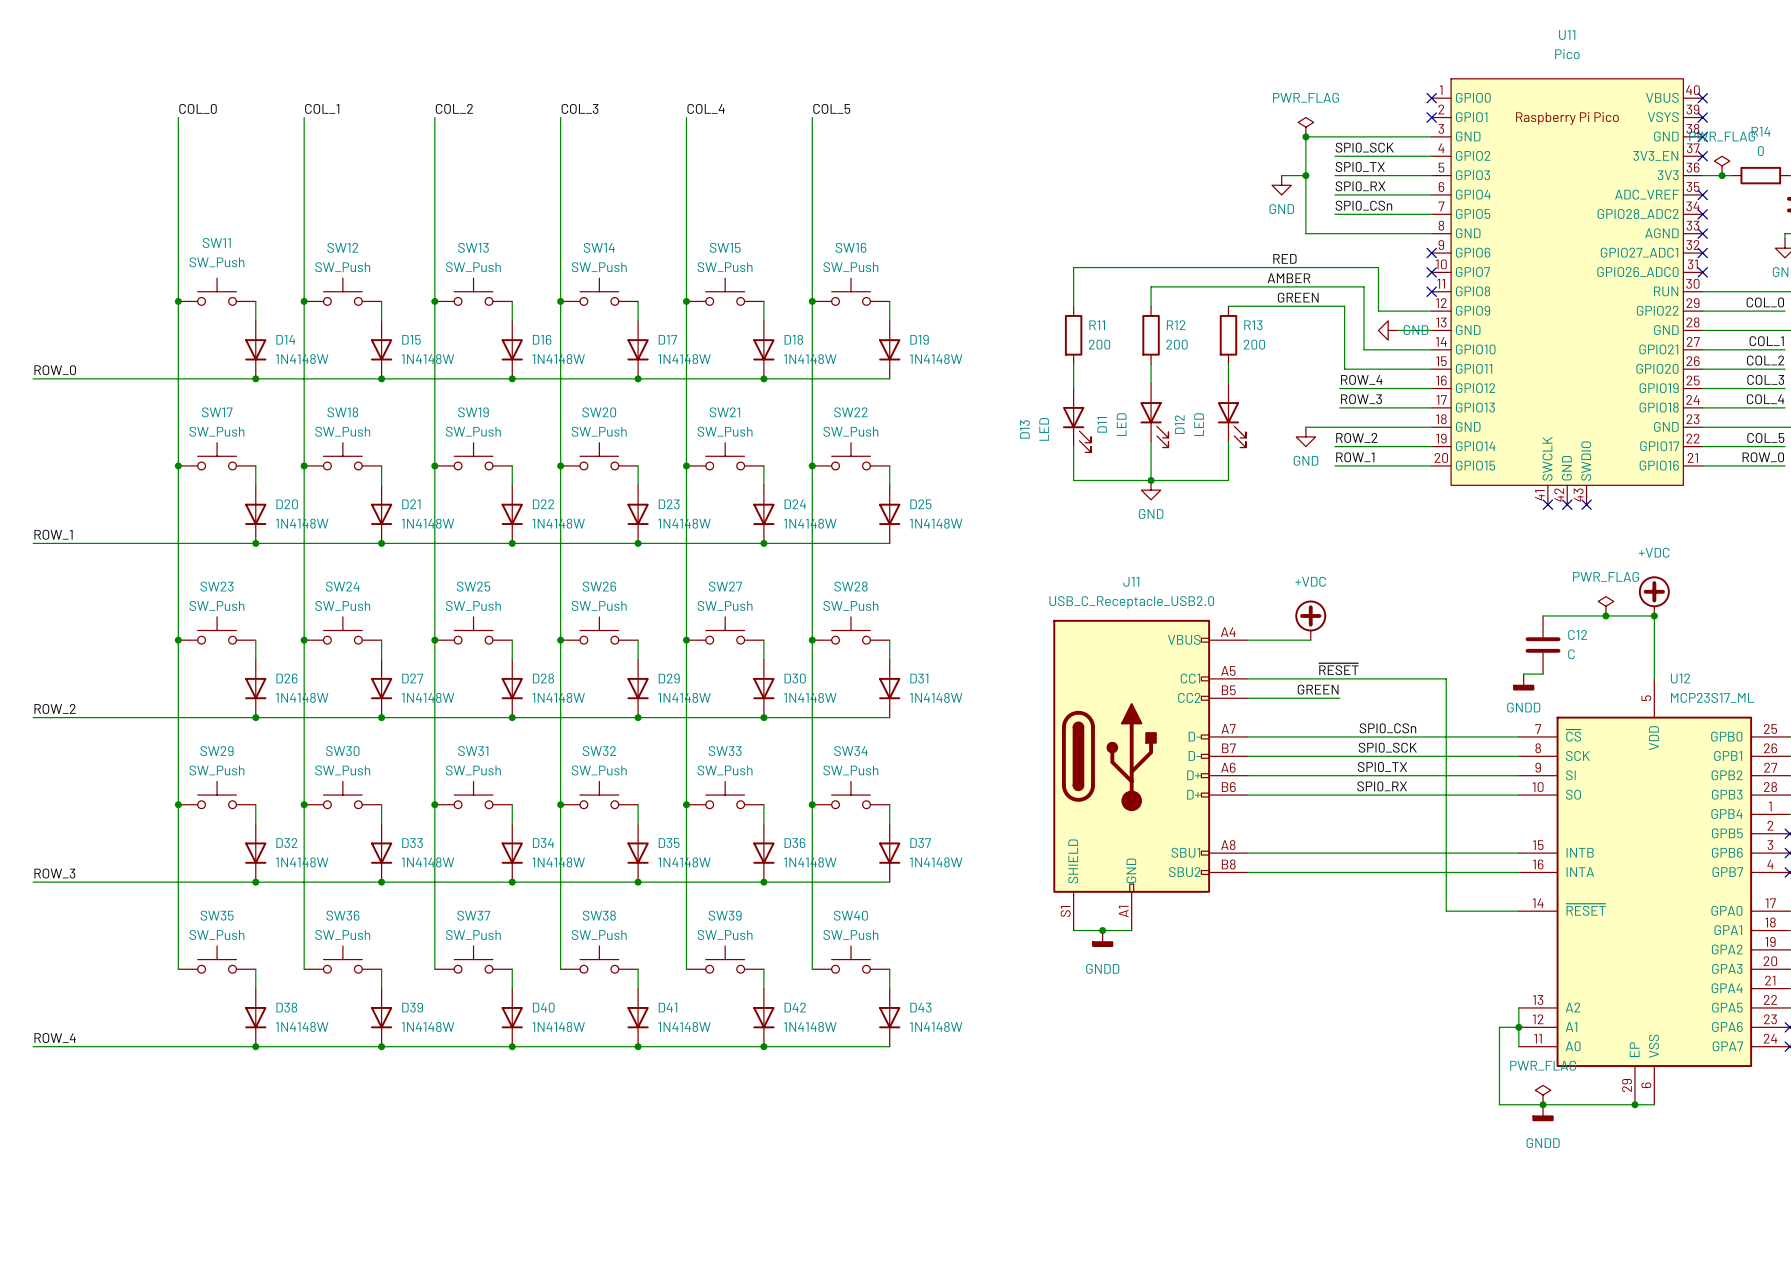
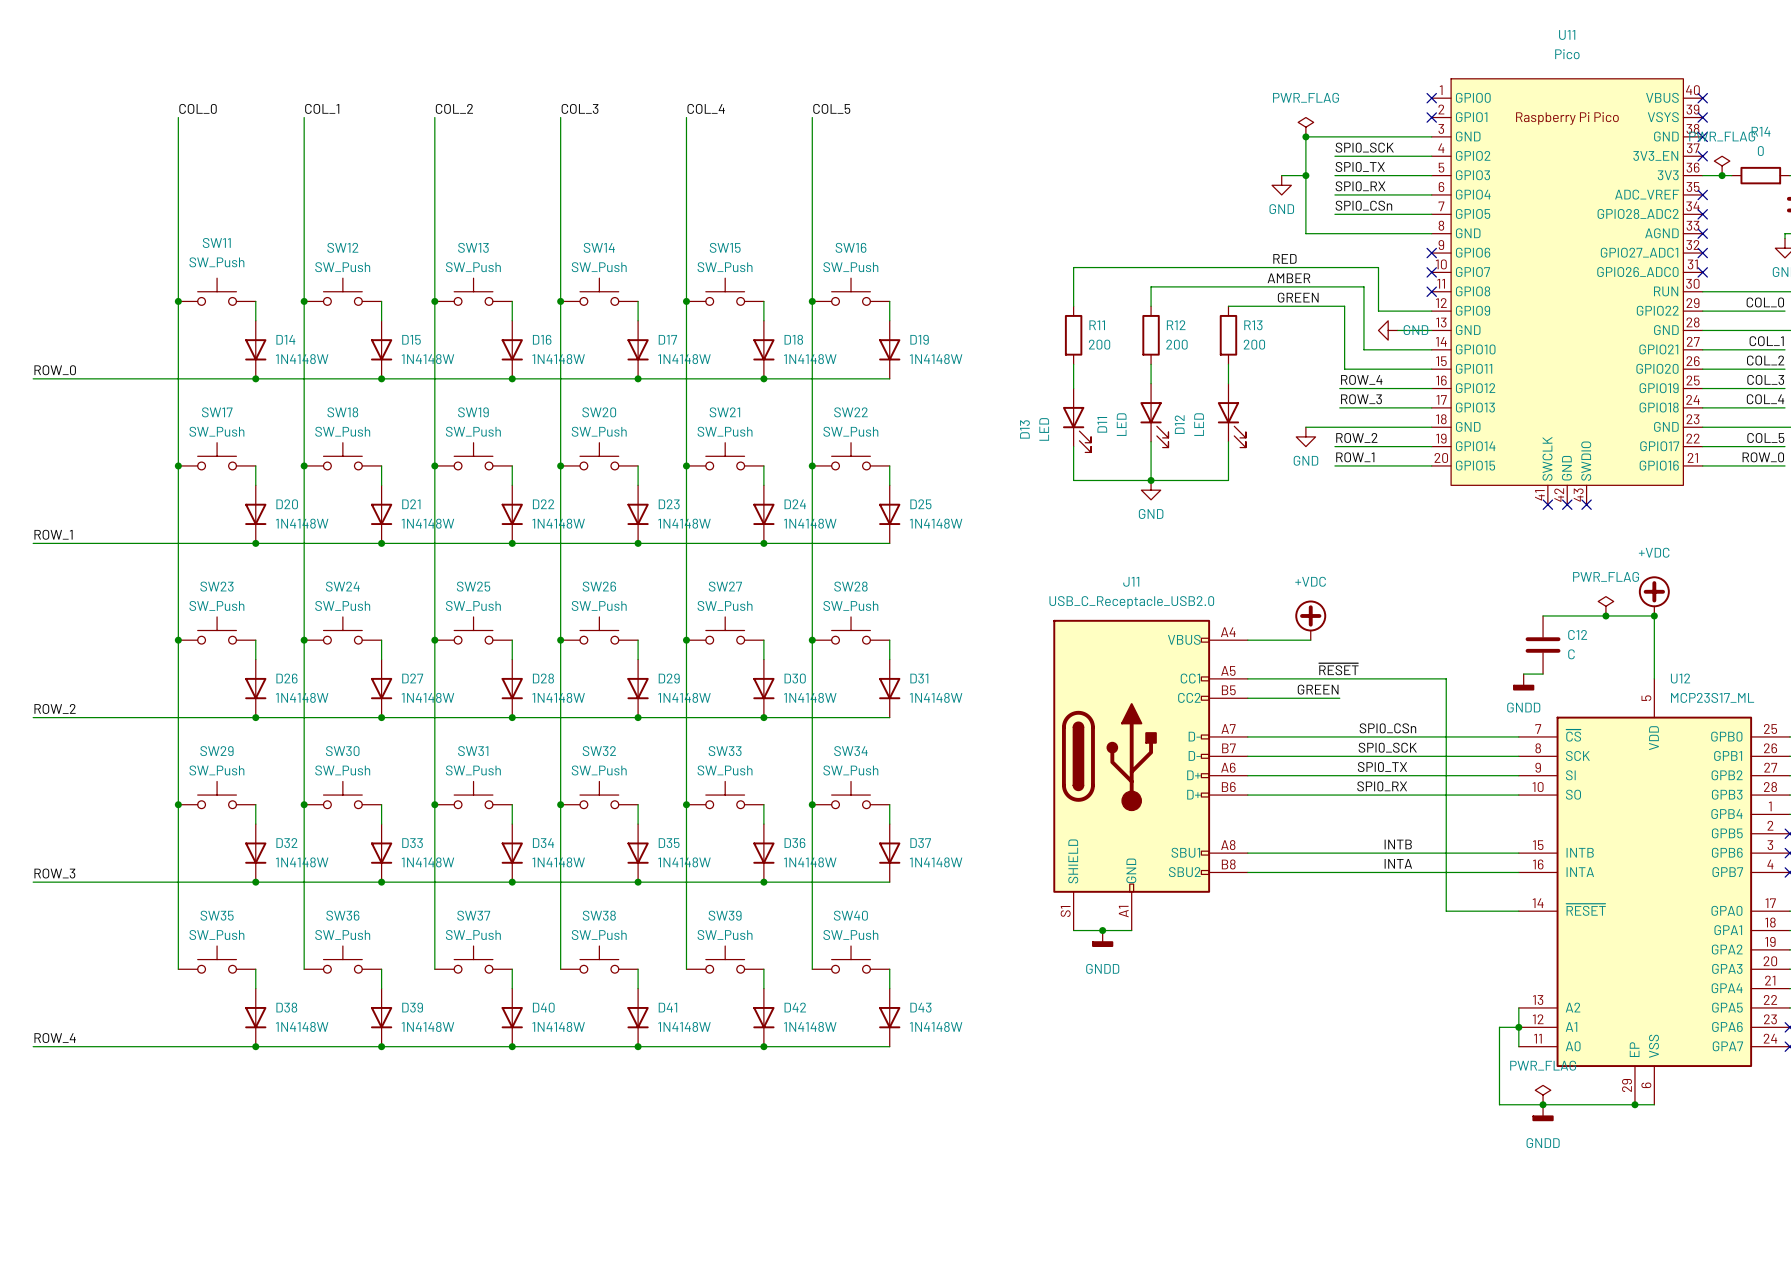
label: none -> INTB (1398, 844)
label: none -> INTA (1398, 863)

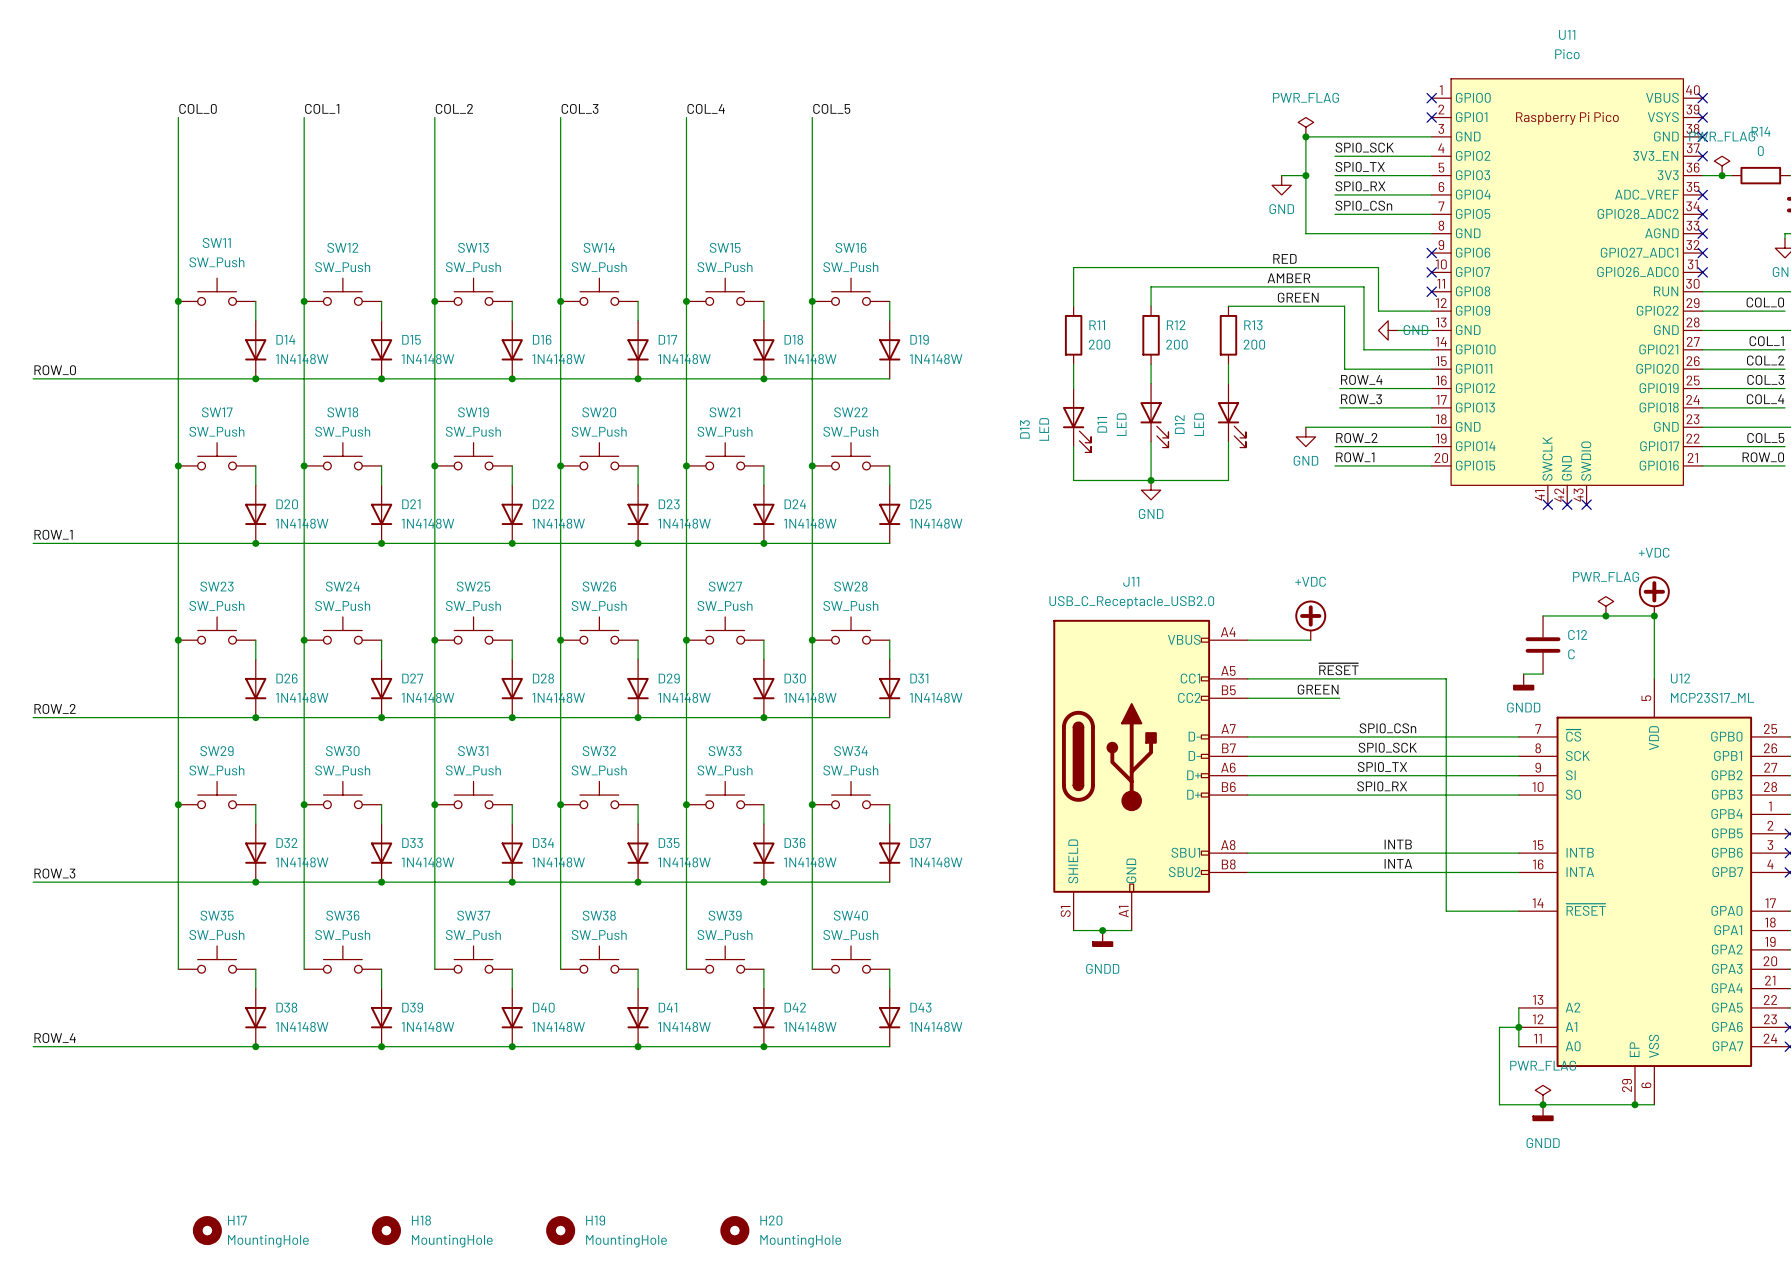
H17: none -> MountingHole (207, 1230)
H18: none -> MountingHole (386, 1230)
H19: none -> MountingHole (560, 1230)
H20: none -> MountingHole (734, 1230)

